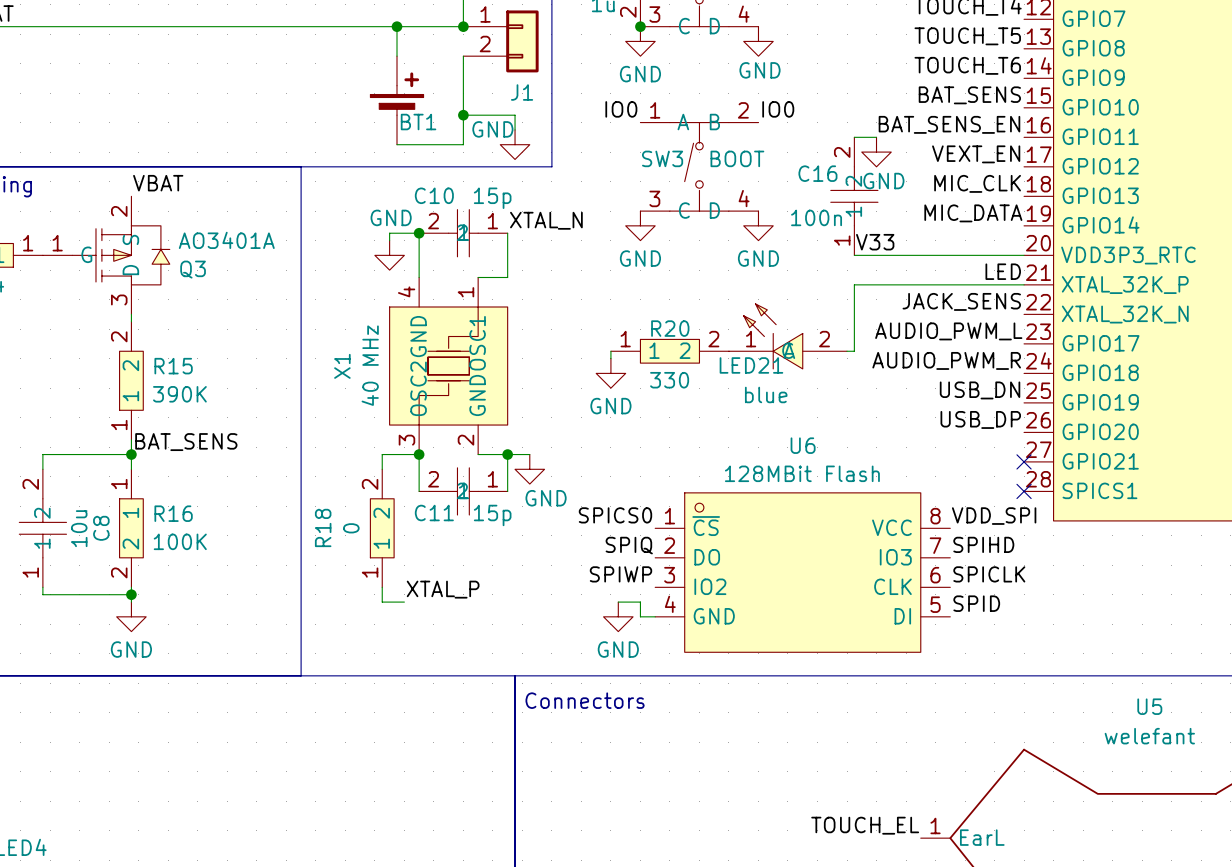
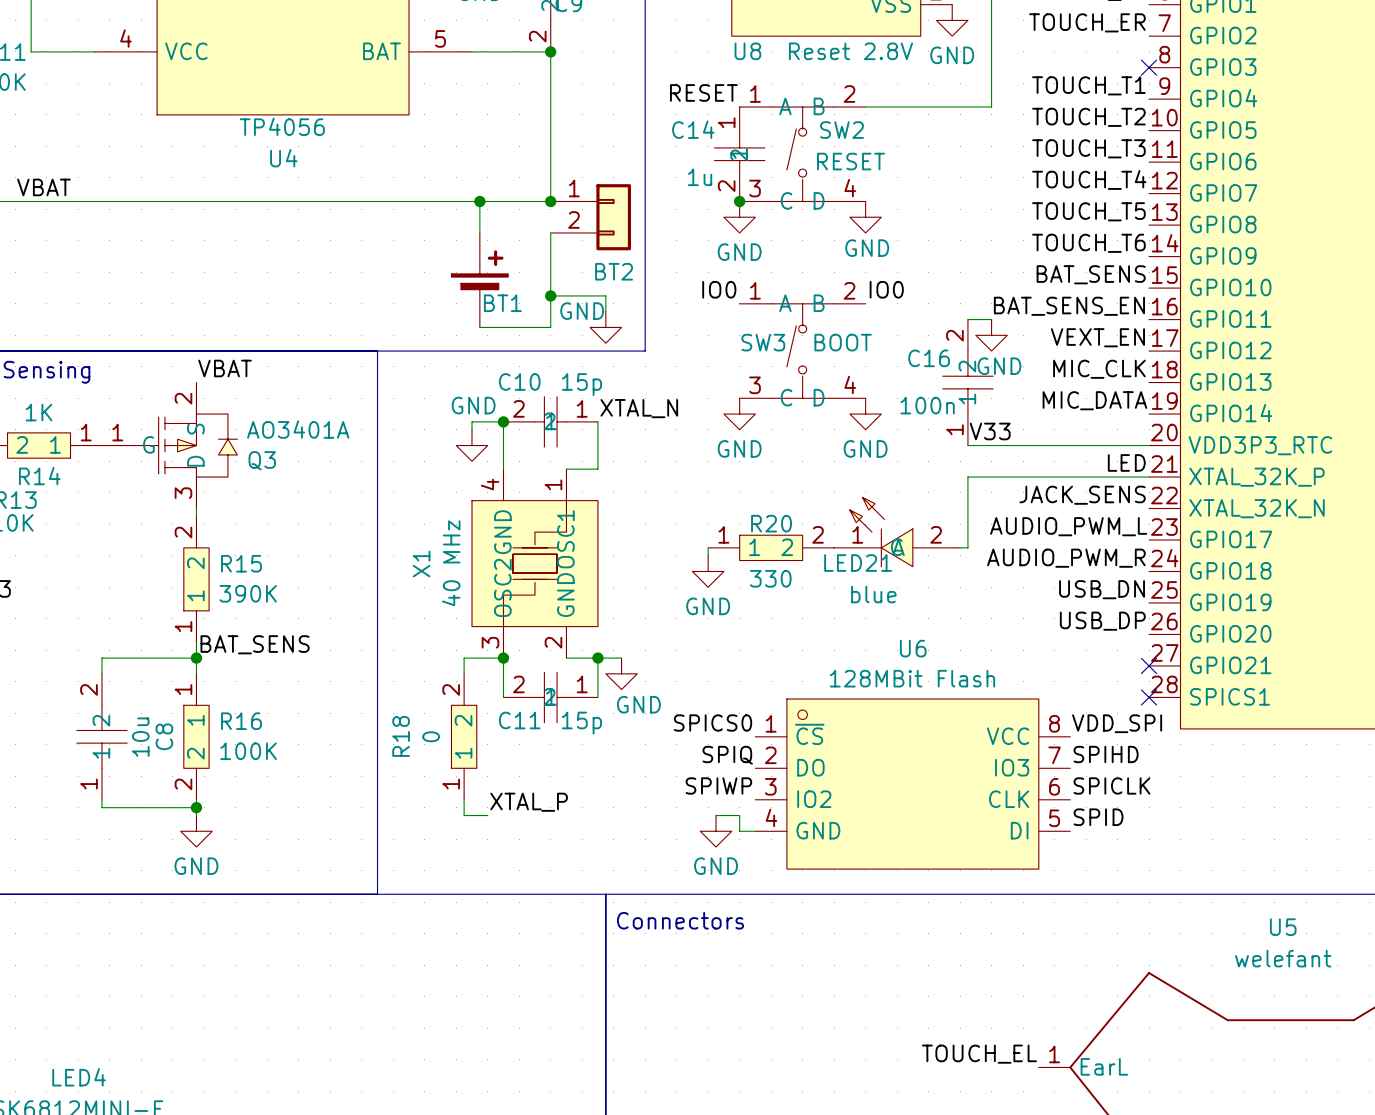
J1 name: J1 (522, 92) -> BT2 (614, 271)

